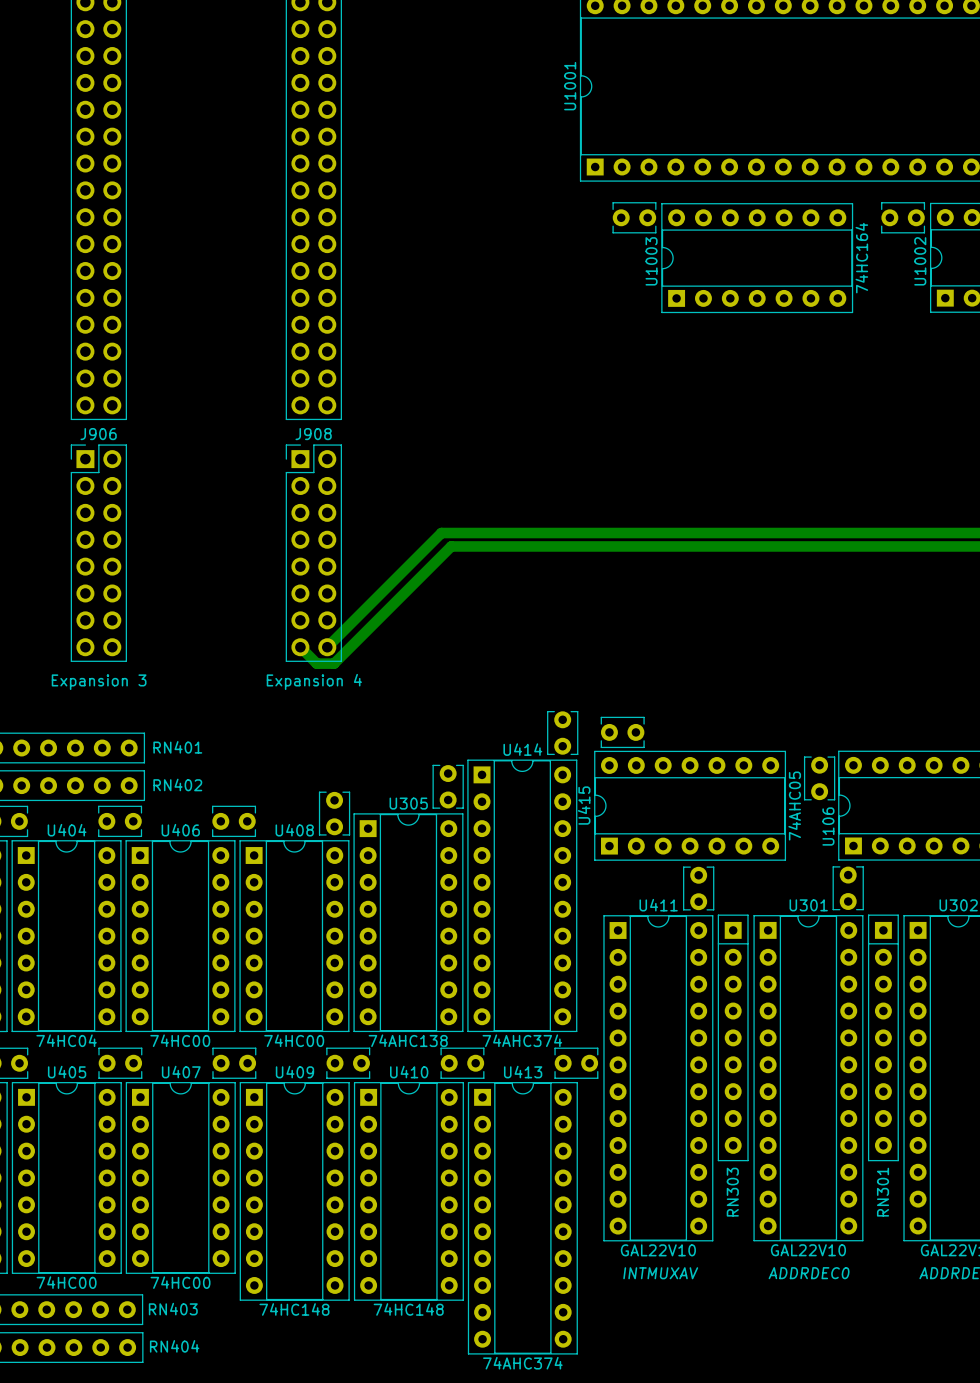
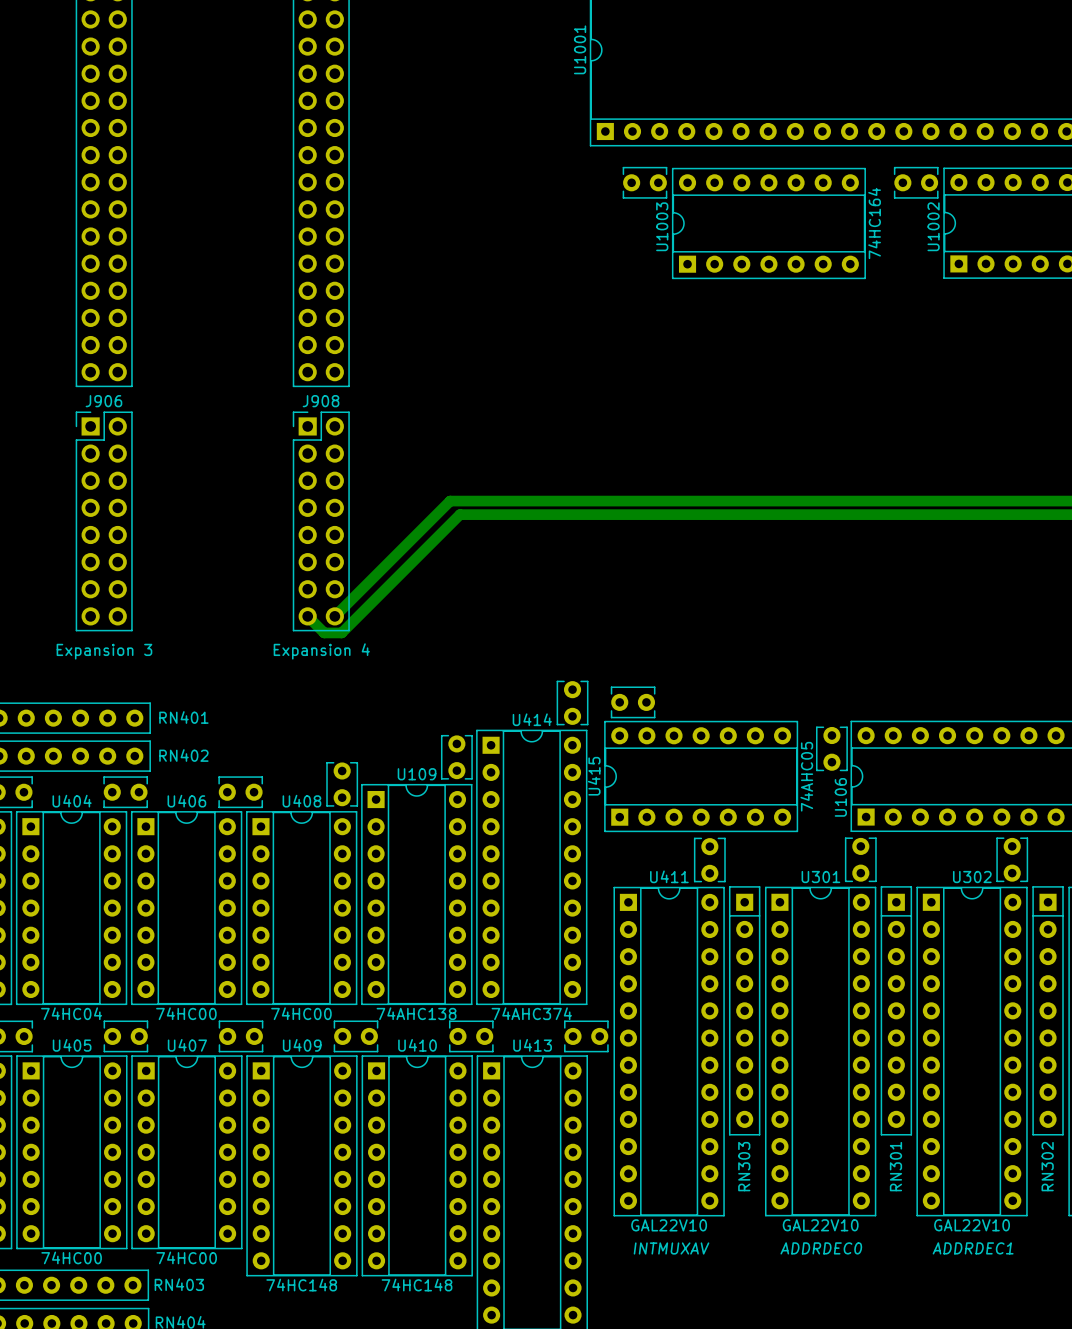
U305 name: U305 (408, 803) -> U109 (417, 774)

